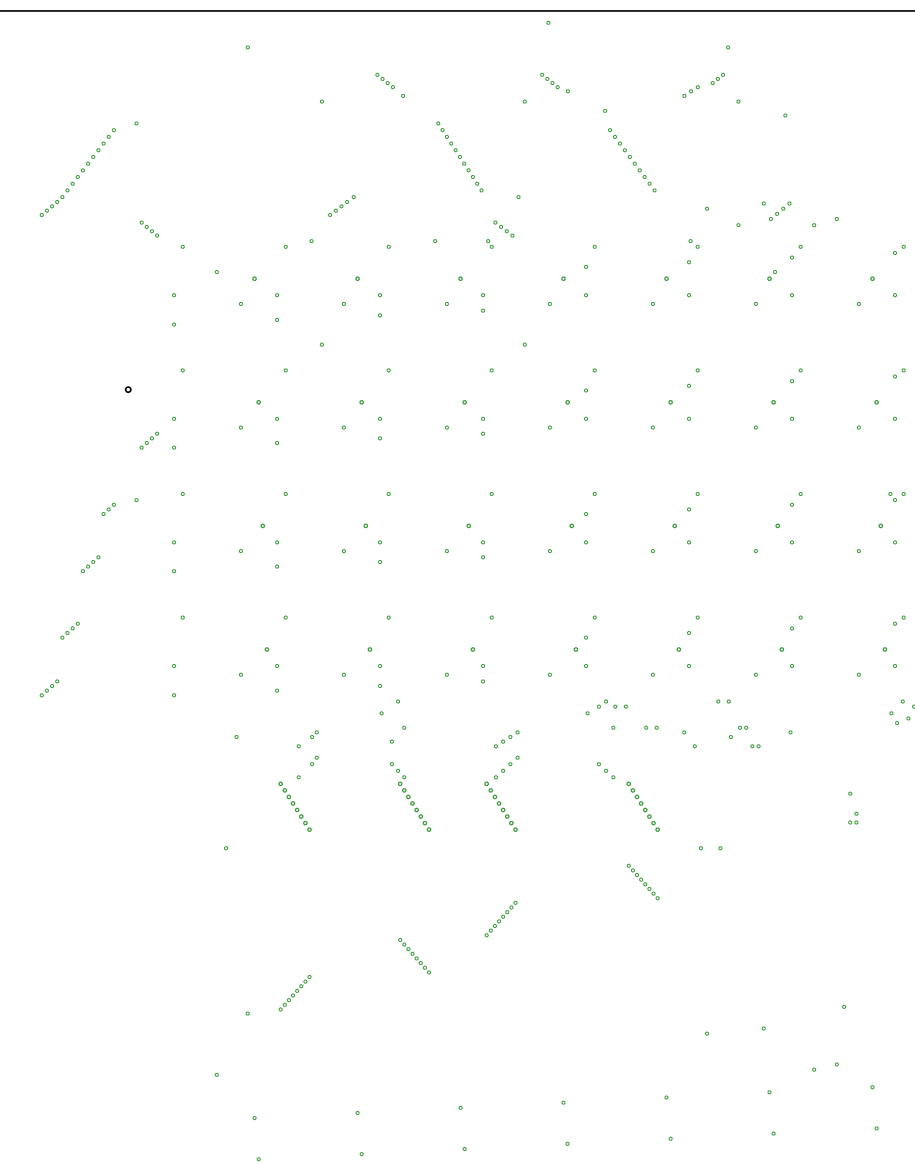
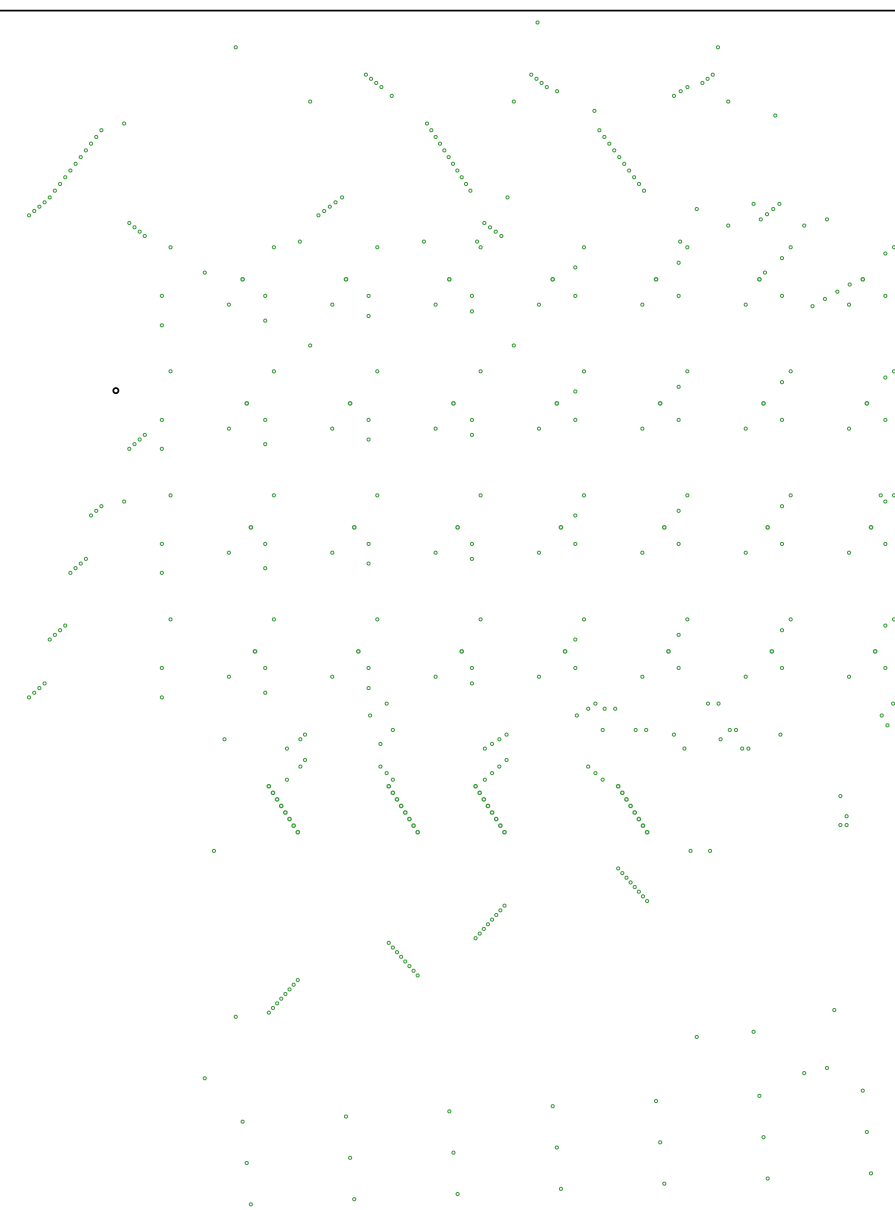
via: none -> (849, 284)
via: none -> (837, 291)
via: none -> (824, 298)
via: none -> (812, 306)

